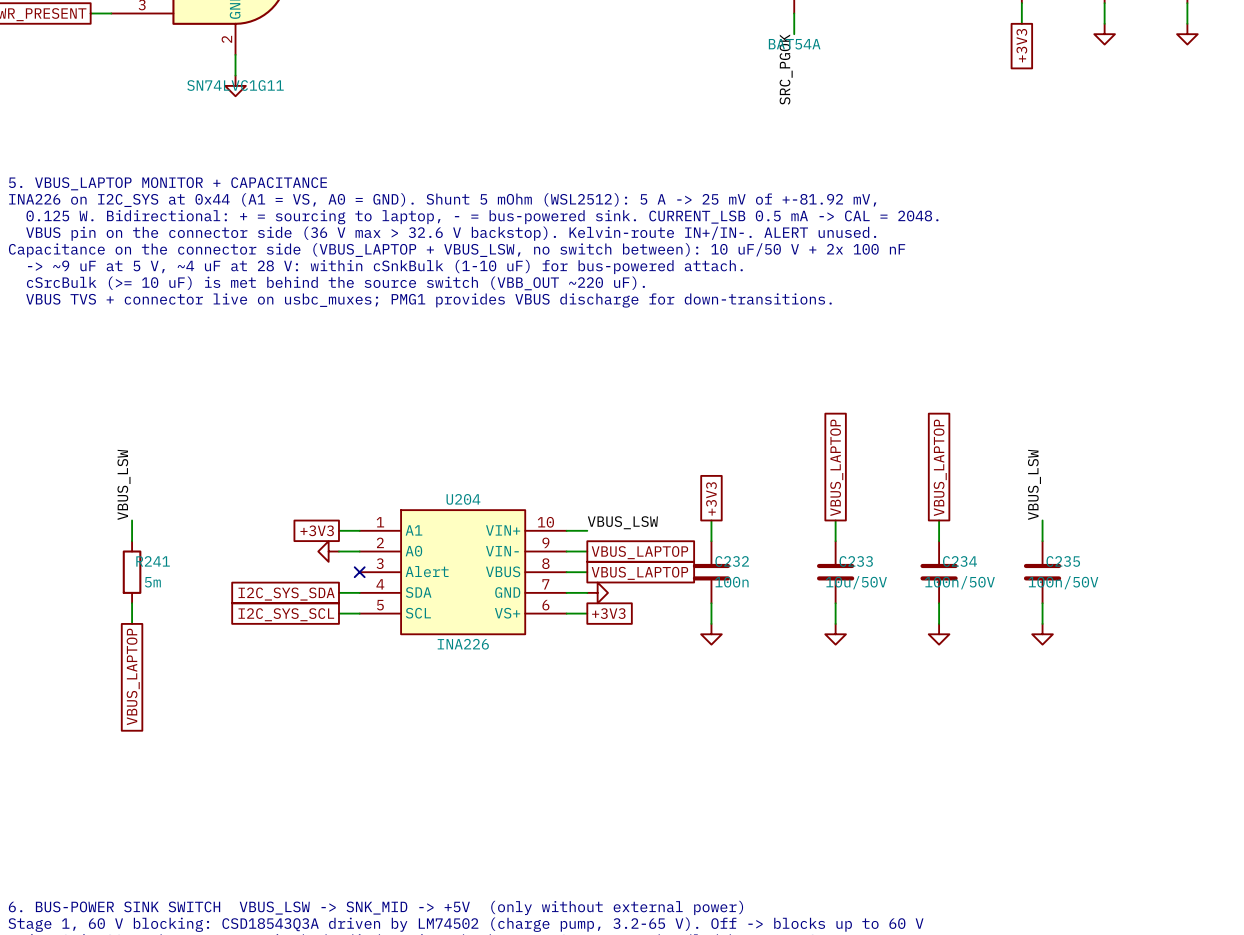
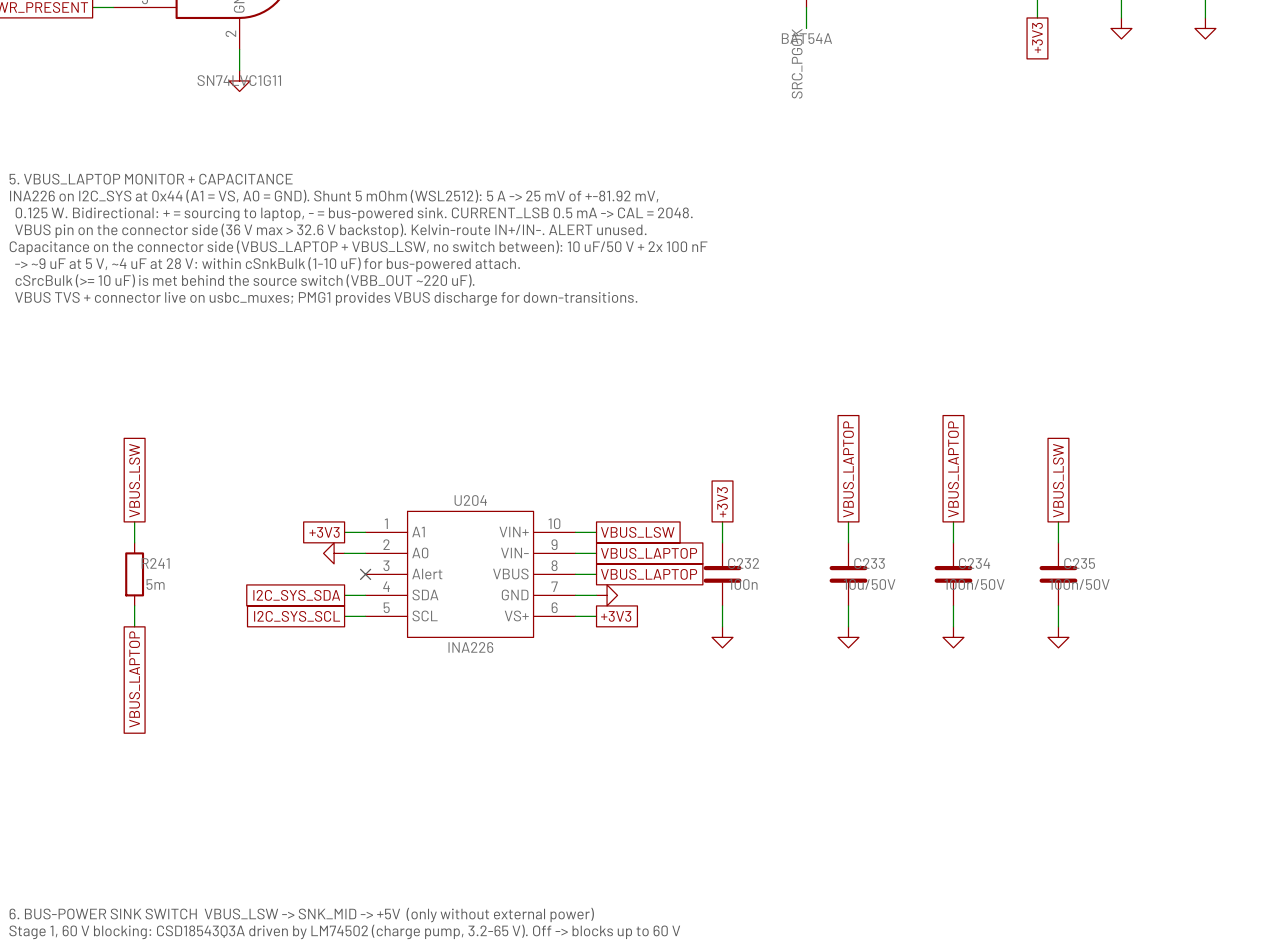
global label: none -> VBUS_LSW (134, 480)
global label: none -> VBUS_LSW (1058, 480)
label: VBUS_LSW (123, 484) -> none
label: VBUS_LSW (1034, 484) -> none
label: VBUS_LSW (622, 522) -> none
global label: none -> VBUS_LSW (637, 532)

